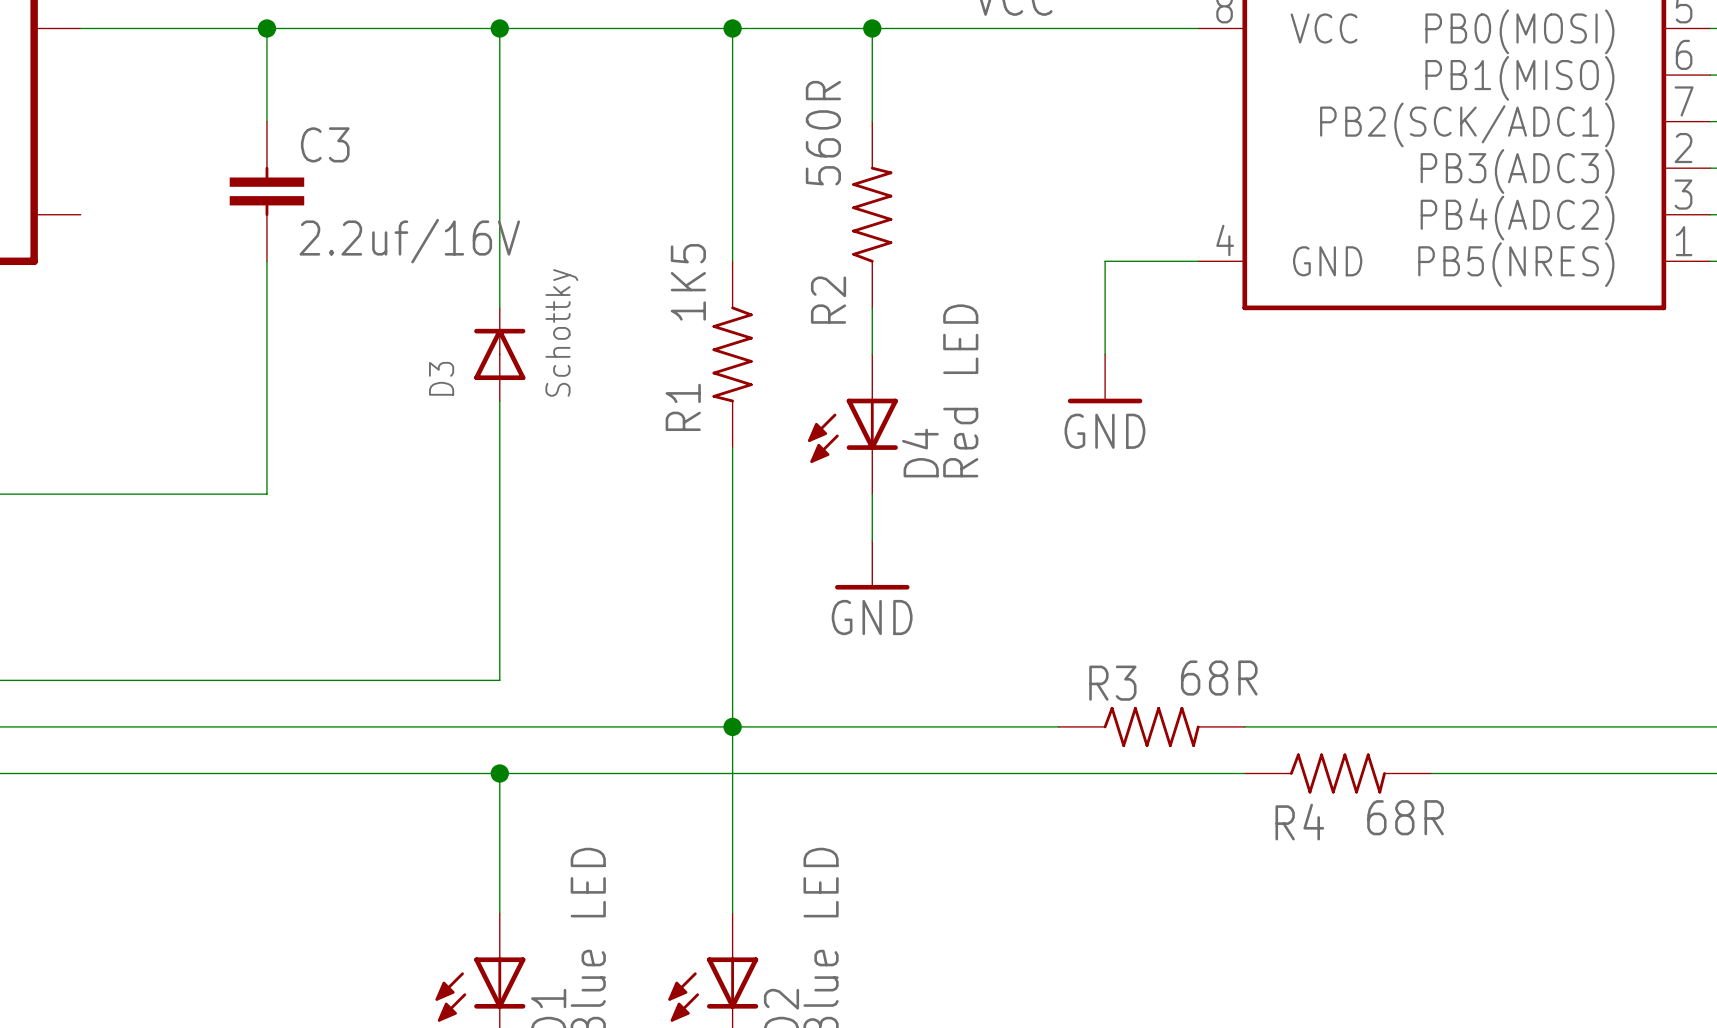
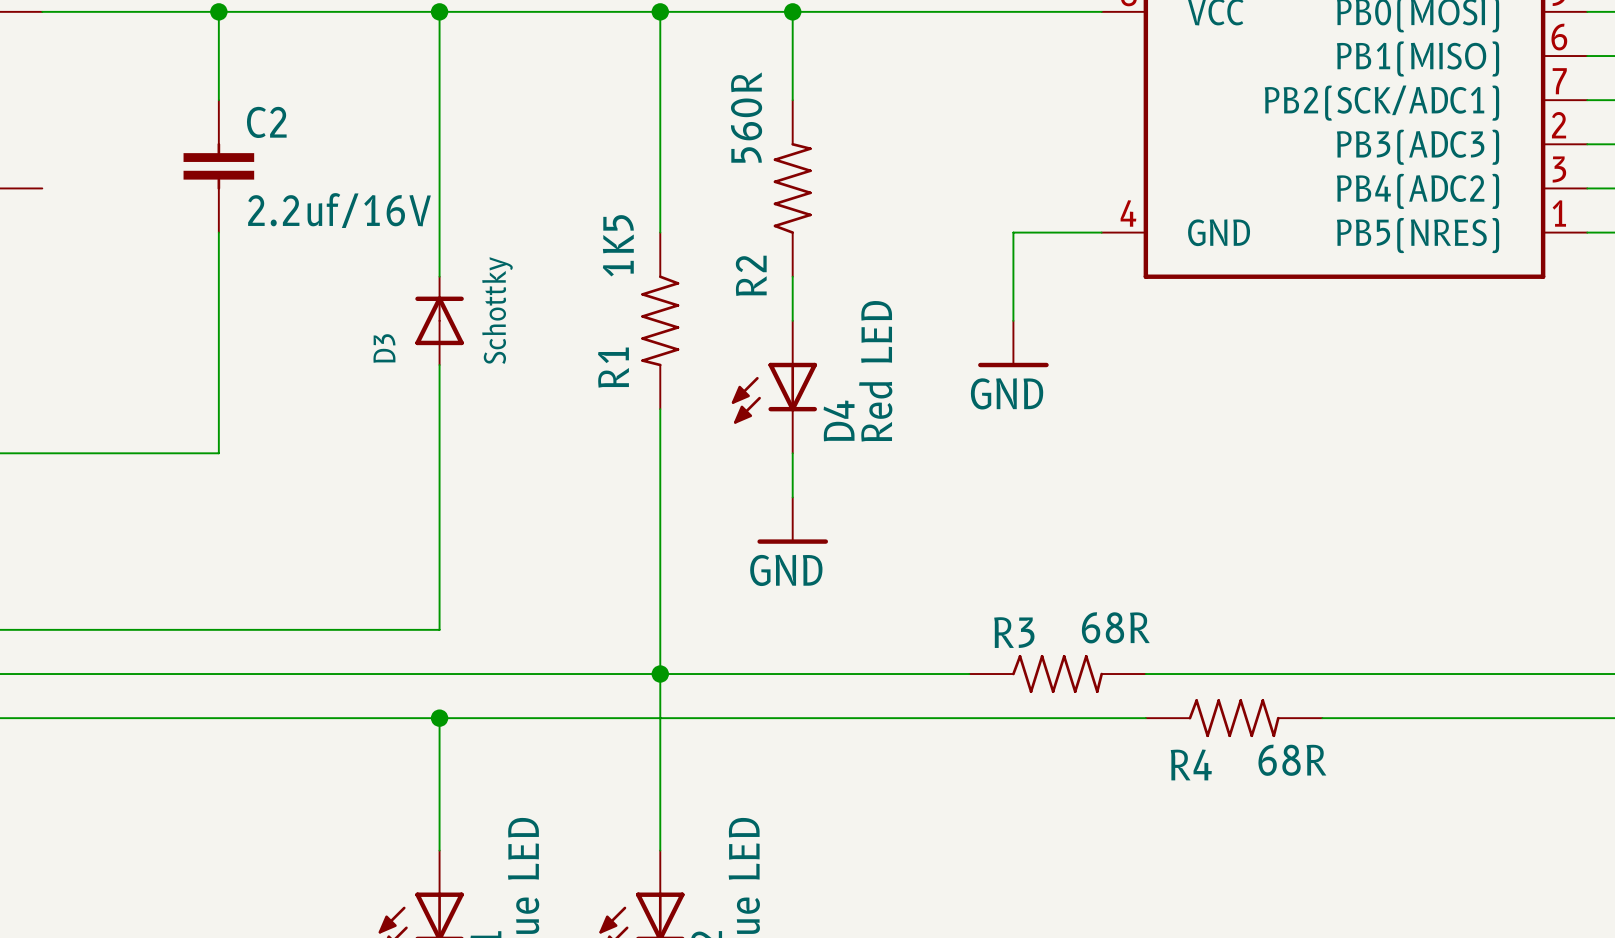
C3 name: C3 (325, 144) -> C2 (266, 122)

